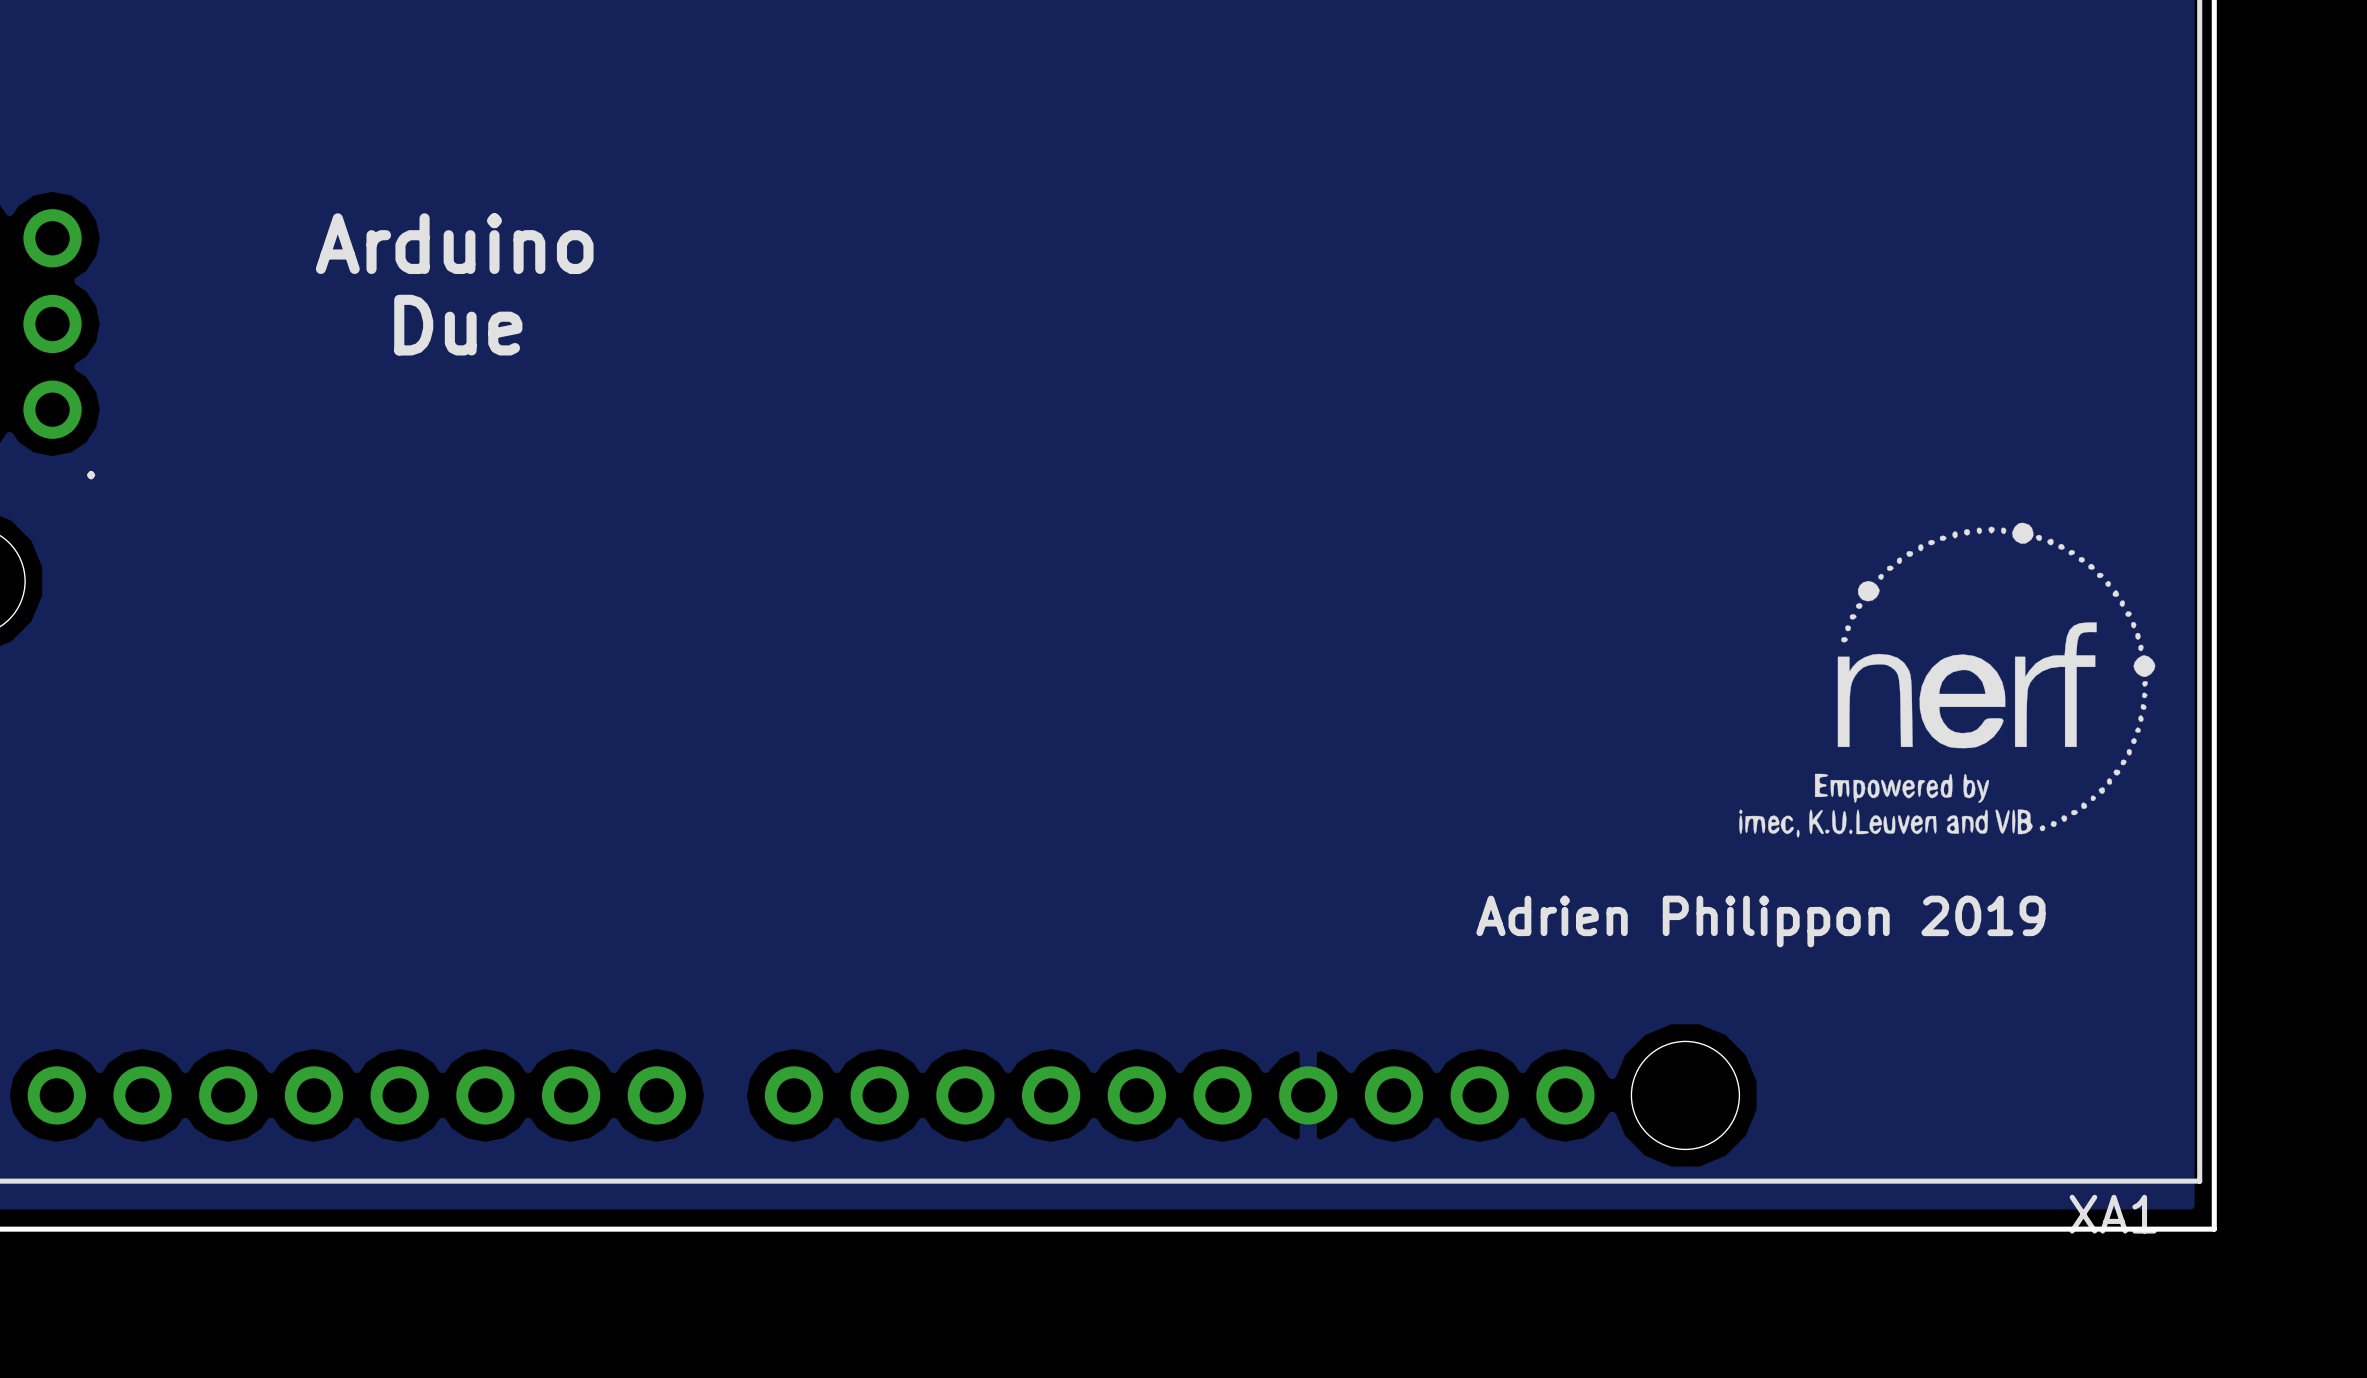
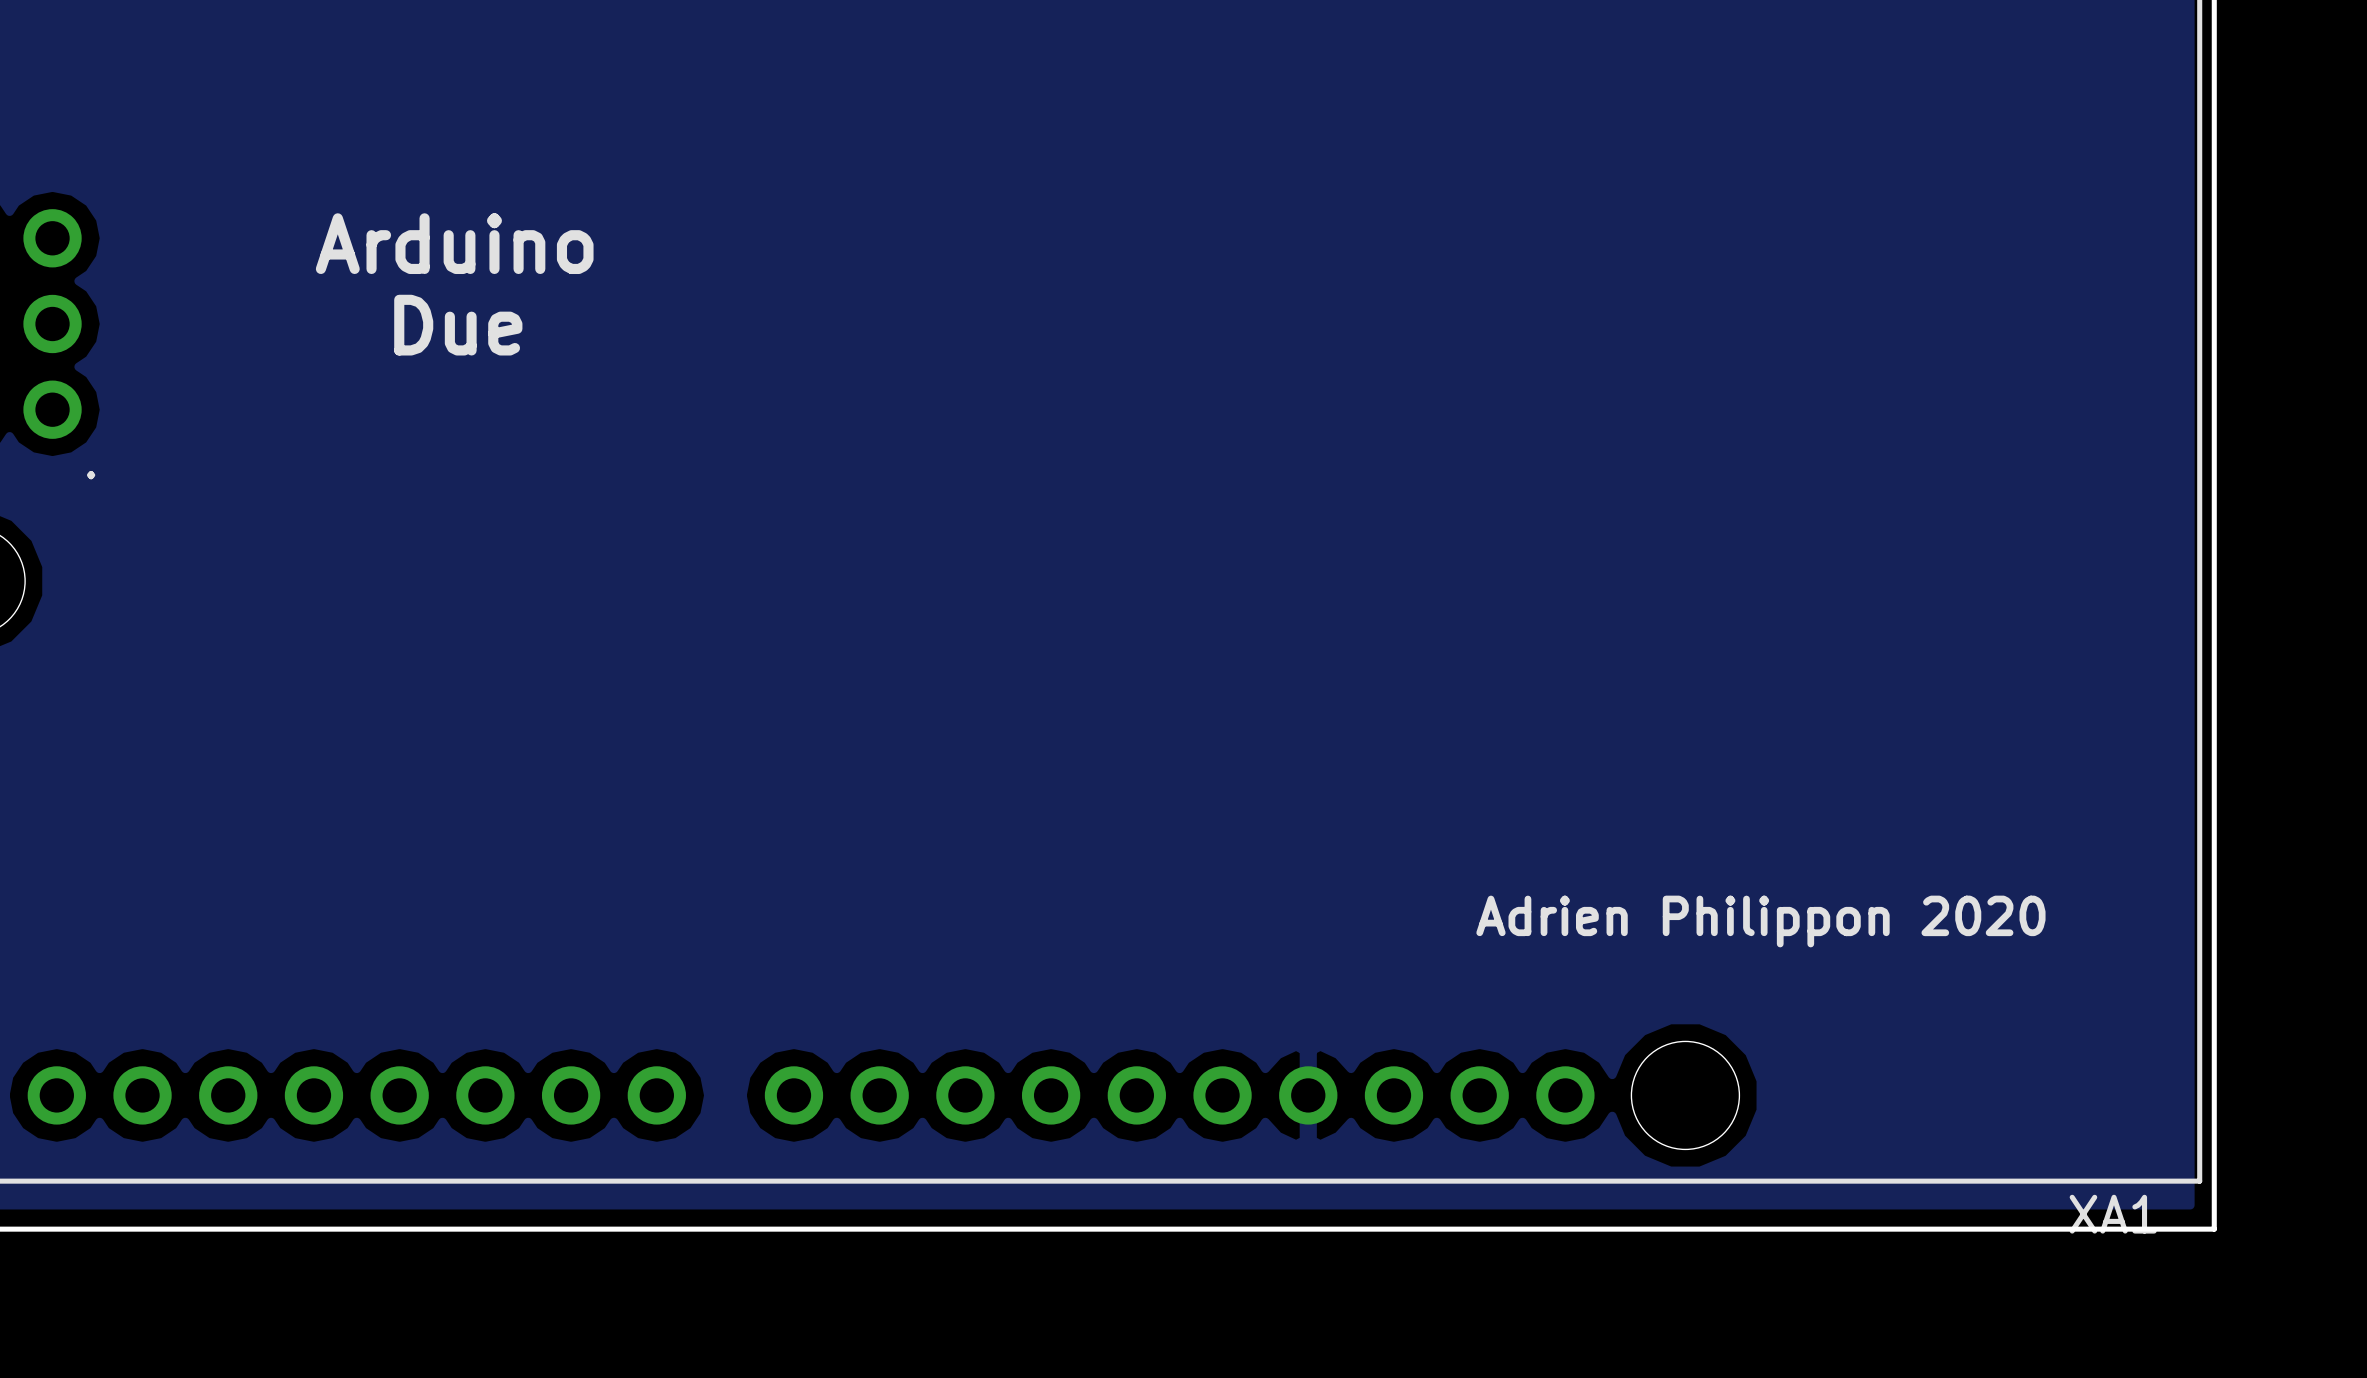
drawing: [1739, 522, 2156, 838] -> none
text: Adrien Philippon 2019 (1760, 921) -> Adrien Philippon 2020 (1760, 921)

